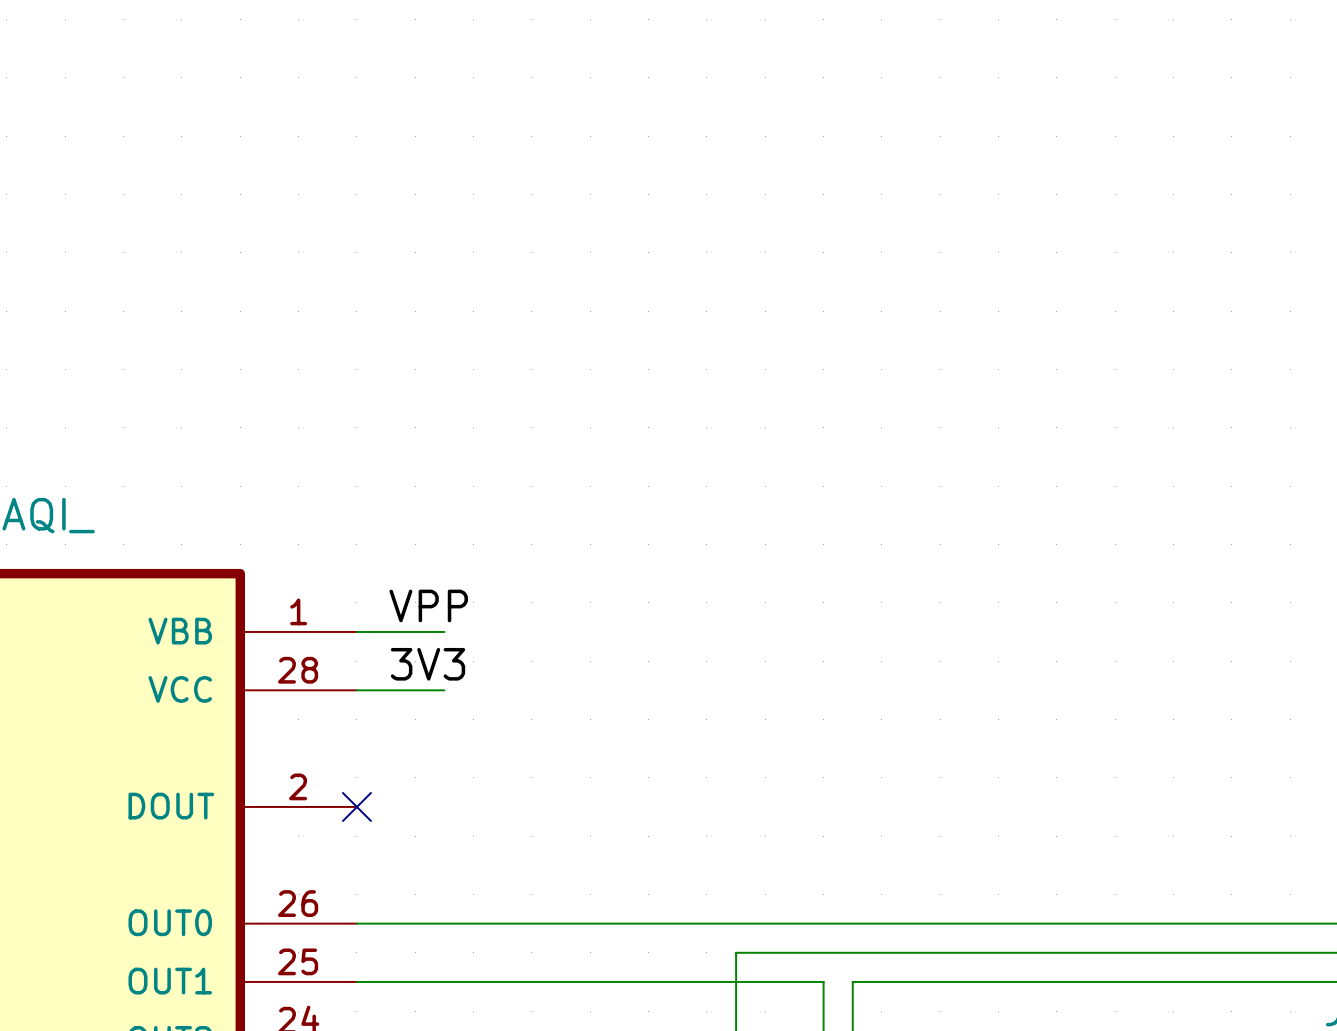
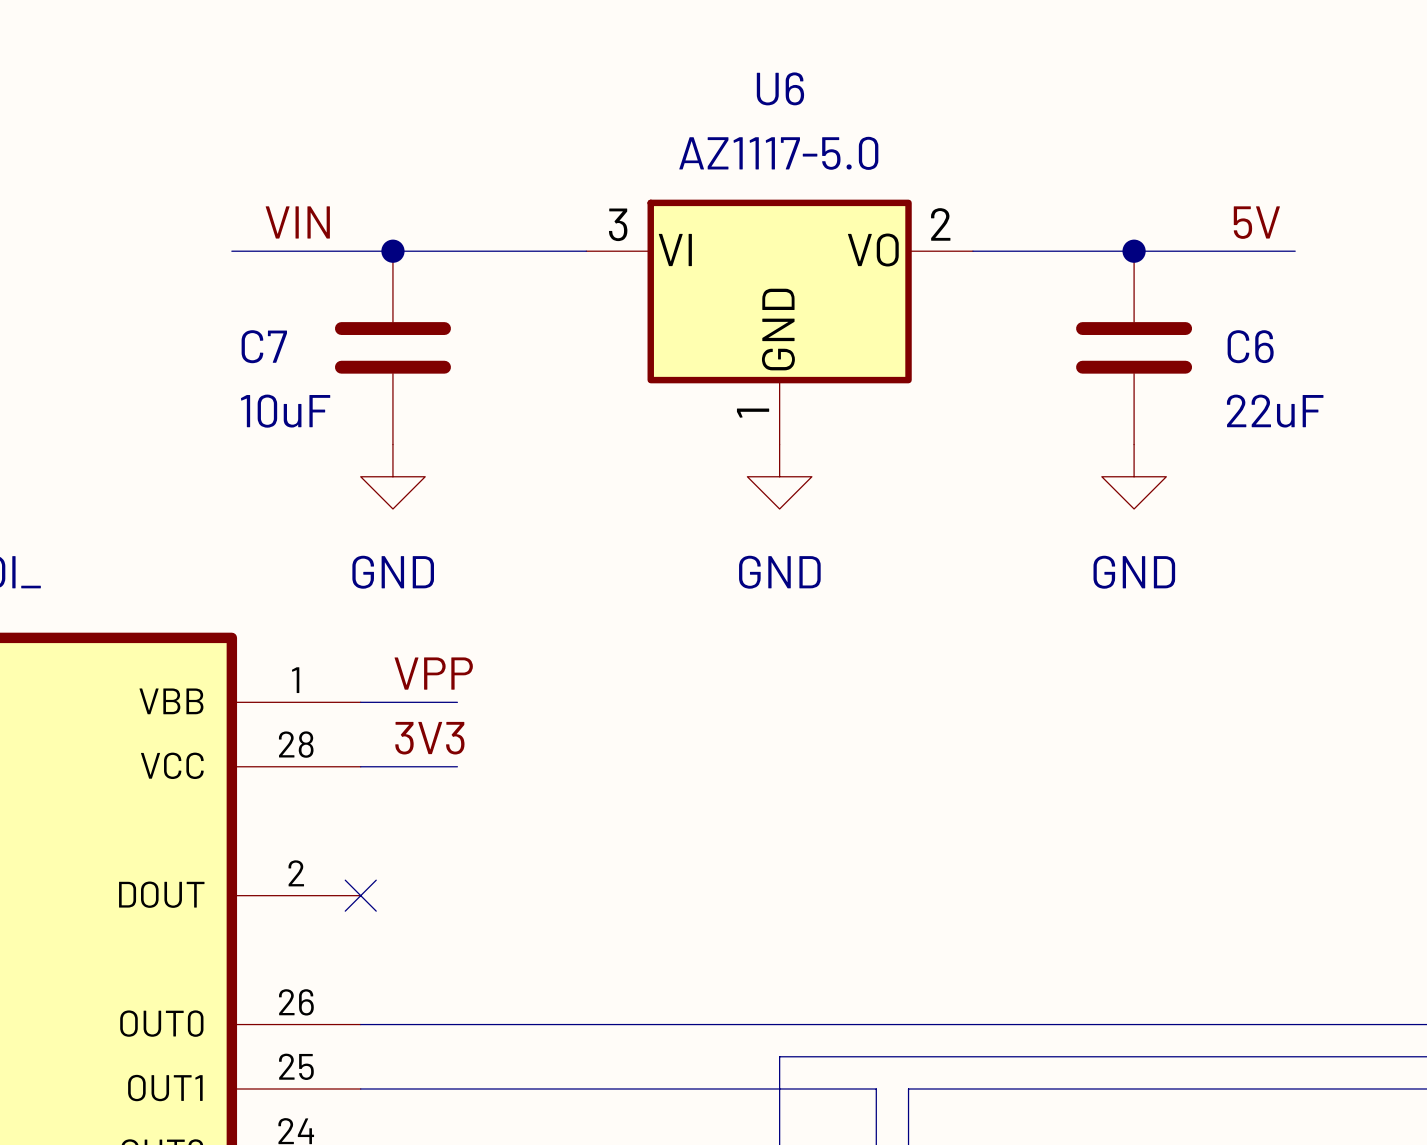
label: none -> VIN (297, 222)
label: none -> 5V (1256, 222)
wire: none -> (231, 251) (586, 251)
junction: none -> (392, 251)
wire: none -> (972, 251) (1295, 251)
junction: none -> (1134, 251)
U6: none -> AZ1117-5.0 (779, 322)
C7: none -> 10uF (392, 347)
C6: none -> 22uF (1134, 347)
power symbol: none -> GND (392, 476)
power symbol: none -> GND (779, 476)
power symbol: none -> GND (1134, 476)

